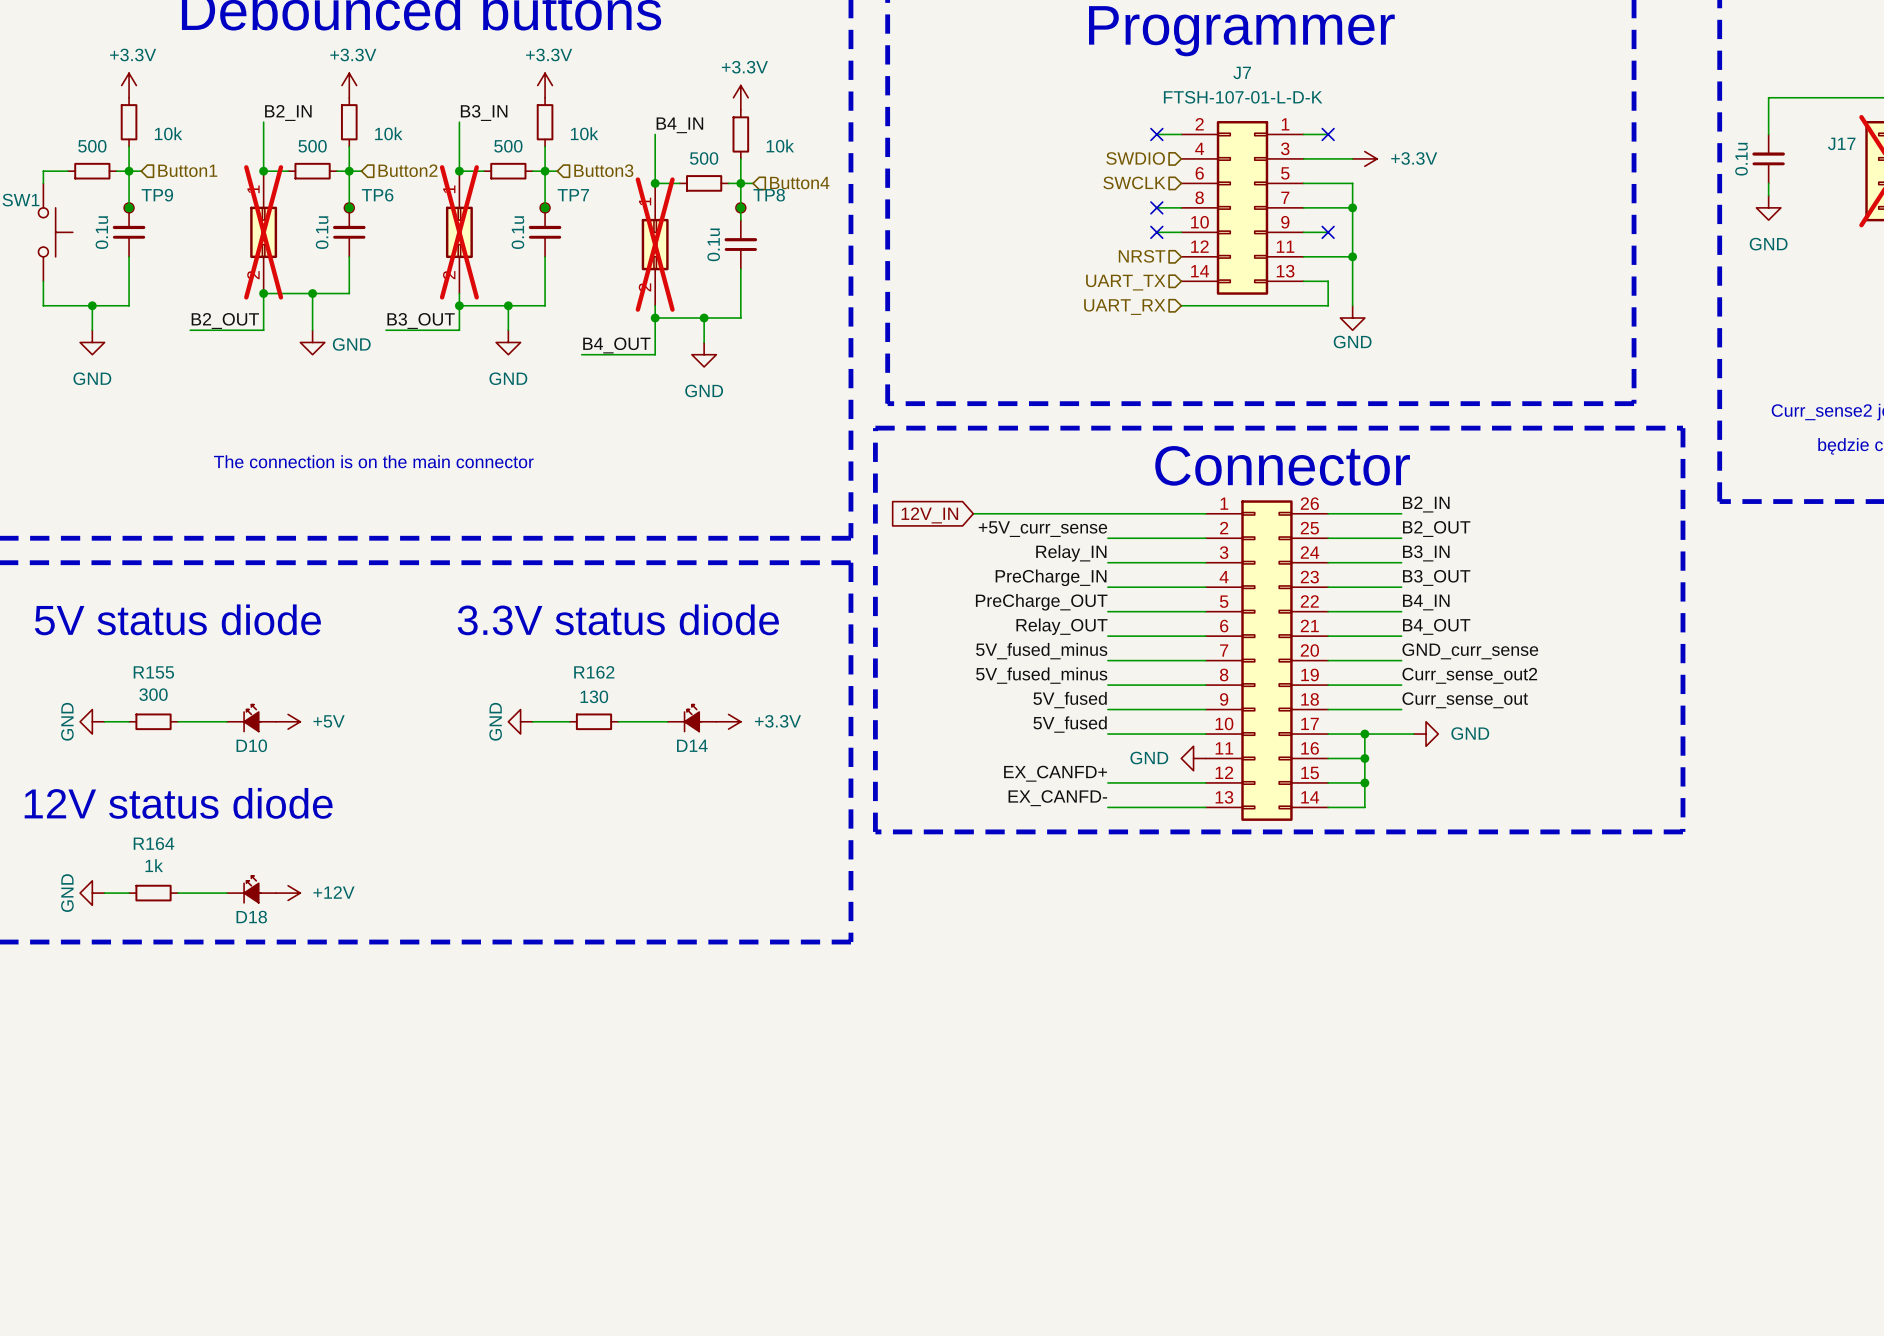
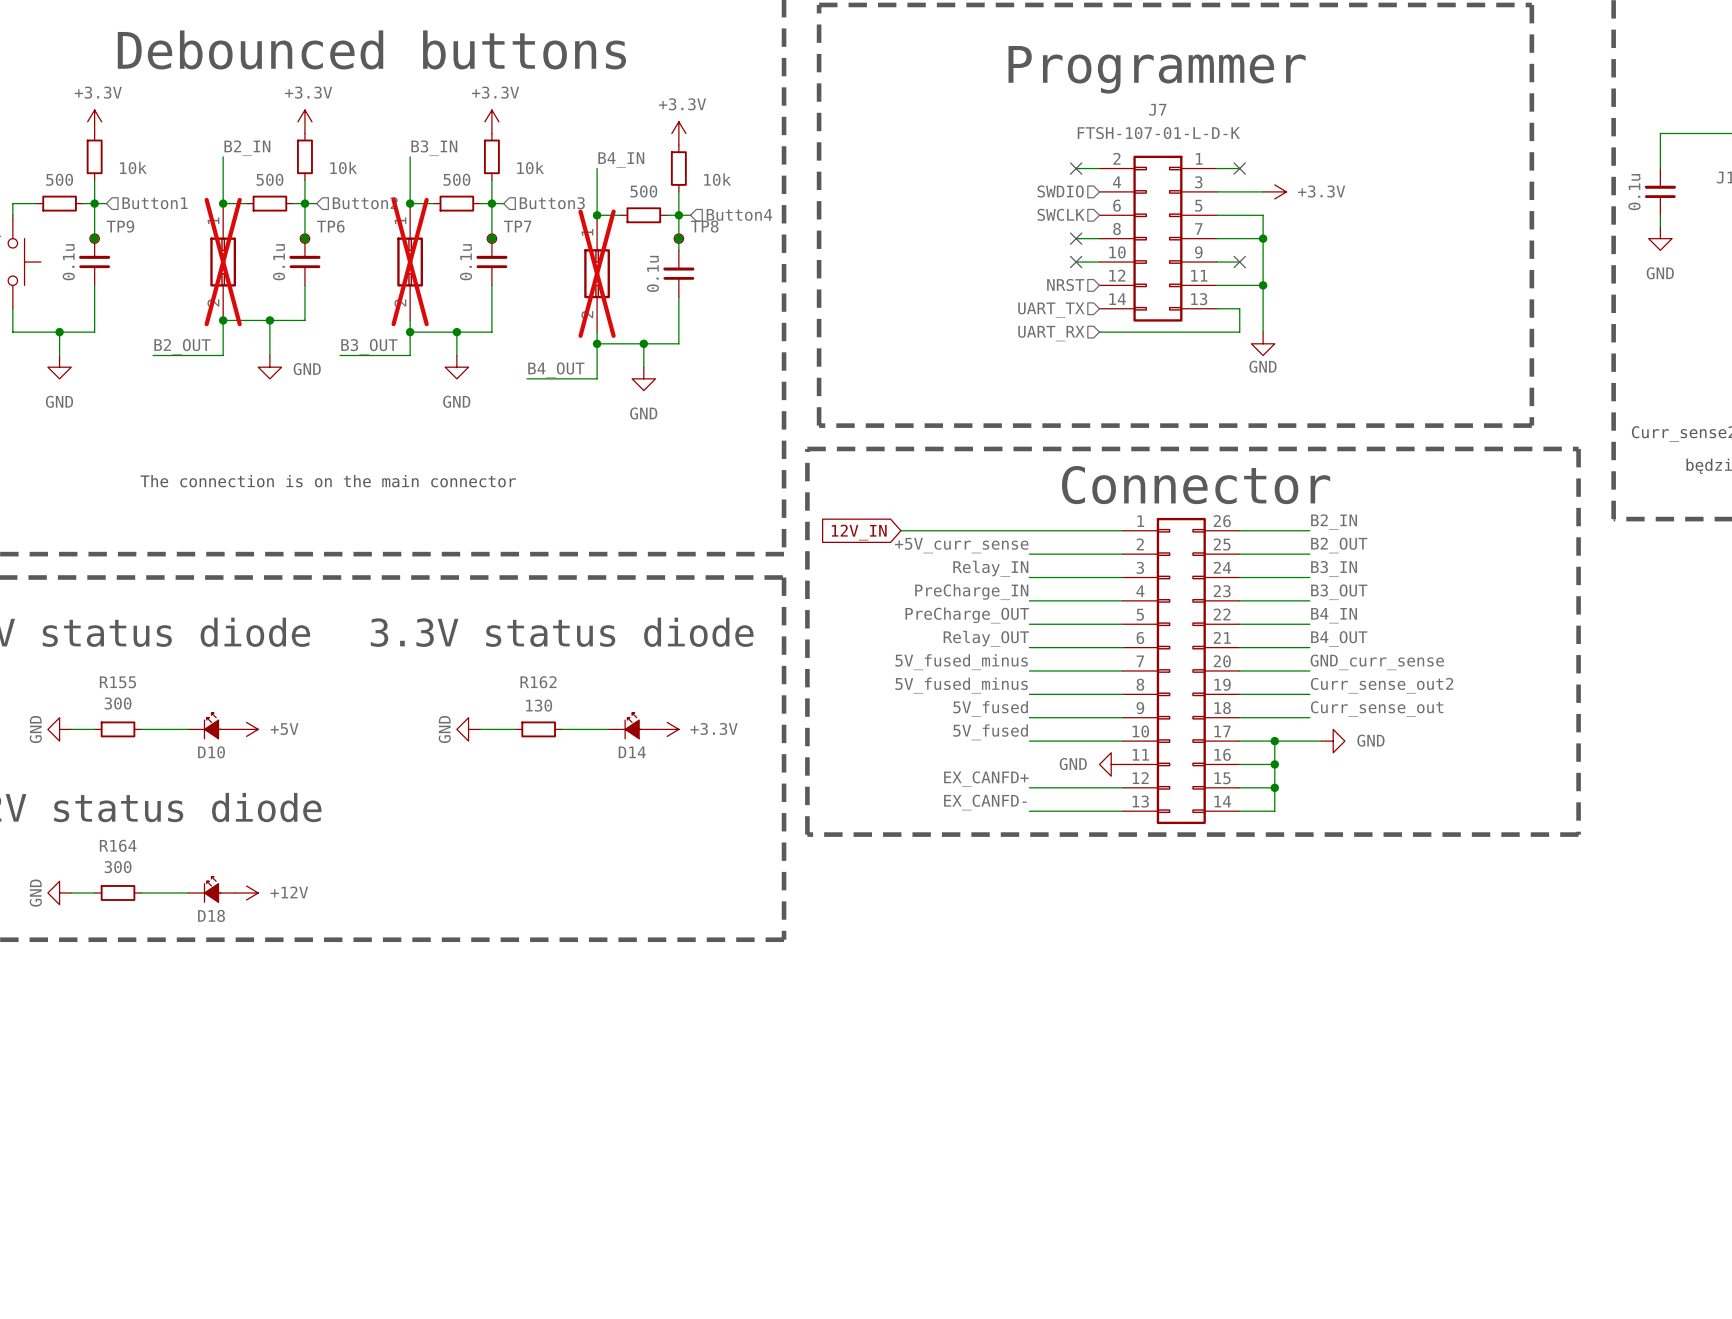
R164 value: 1k (154, 865) -> 300 (118, 867)

